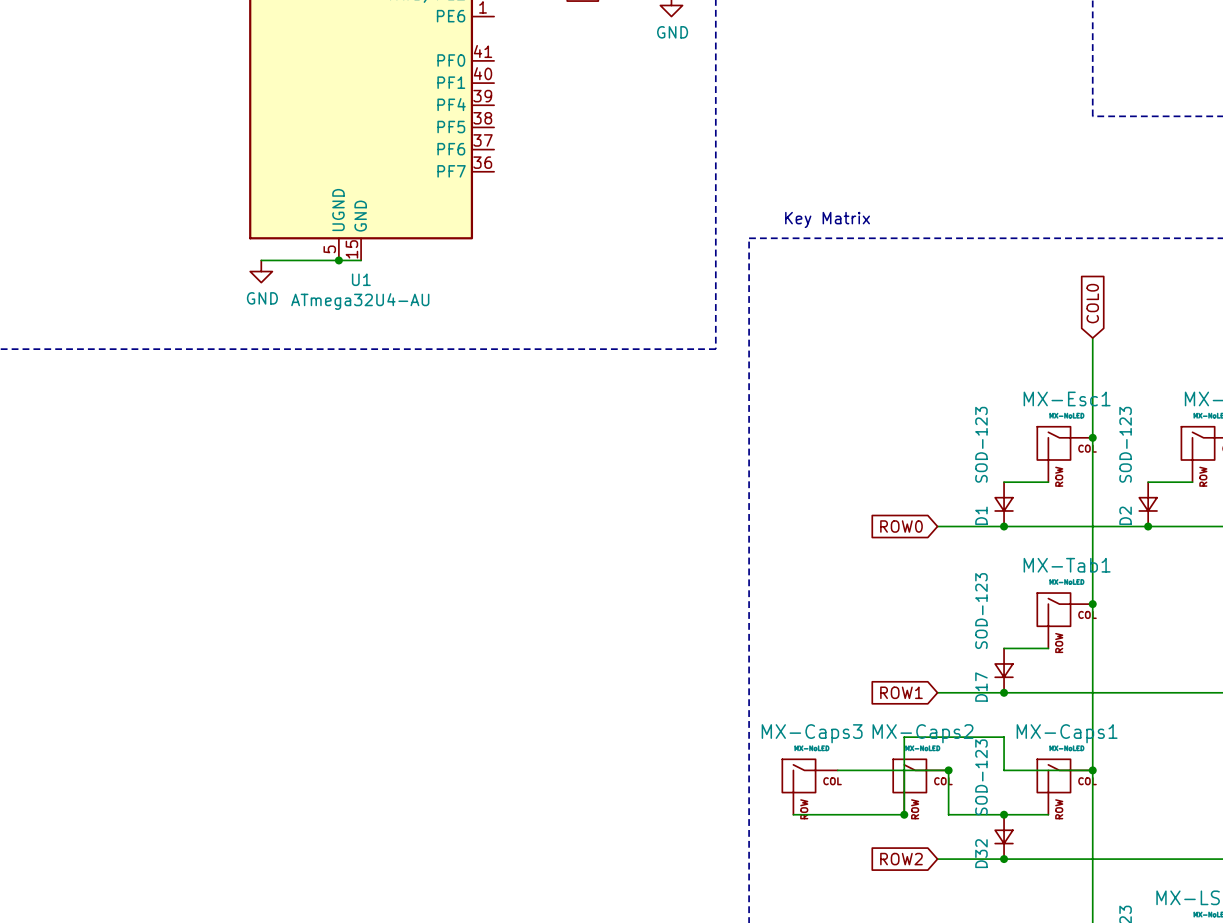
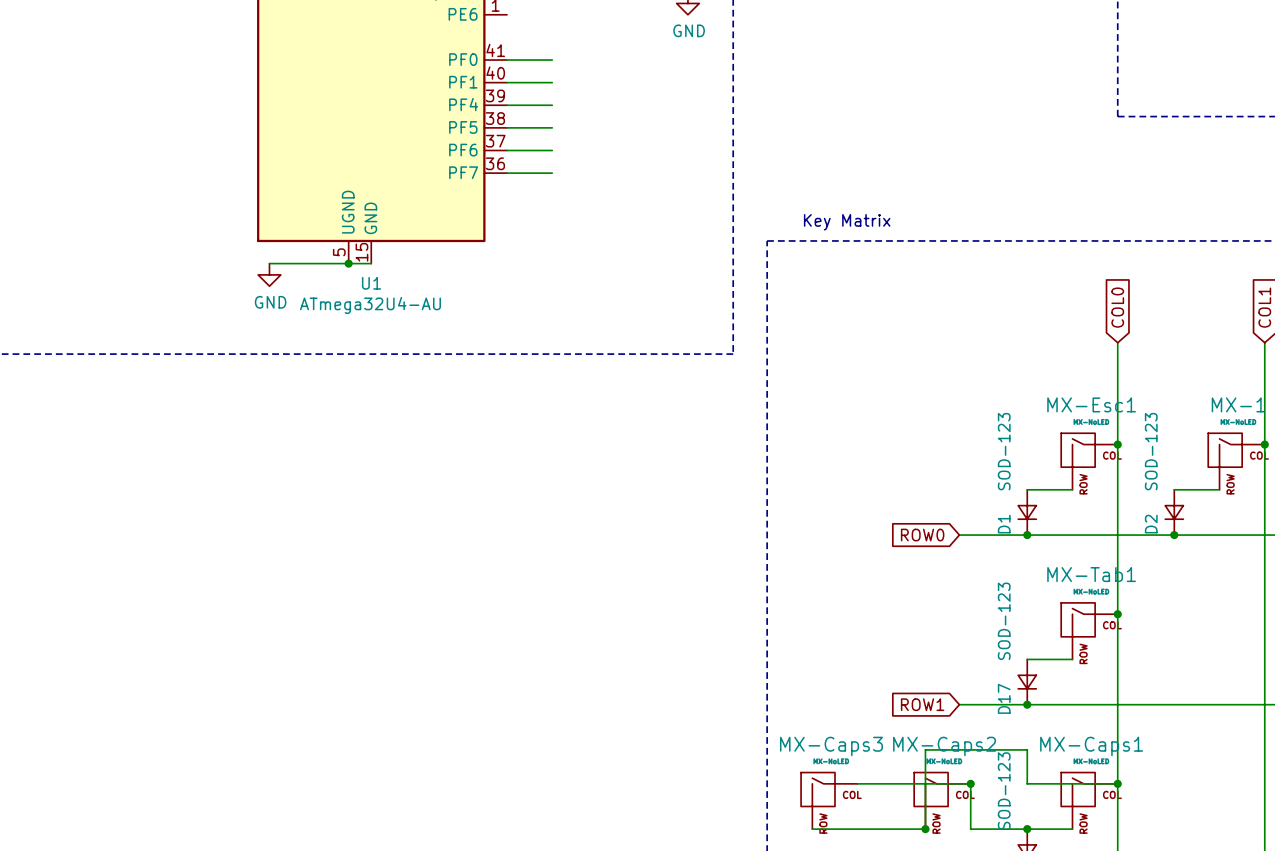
wire: none -> (507, 60) (552, 60)
wire: none -> (507, 82) (552, 82)
wire: none -> (507, 105) (552, 105)
wire: none -> (507, 127) (552, 127)
wire: none -> (507, 150) (552, 150)
wire: none -> (507, 173) (552, 173)

